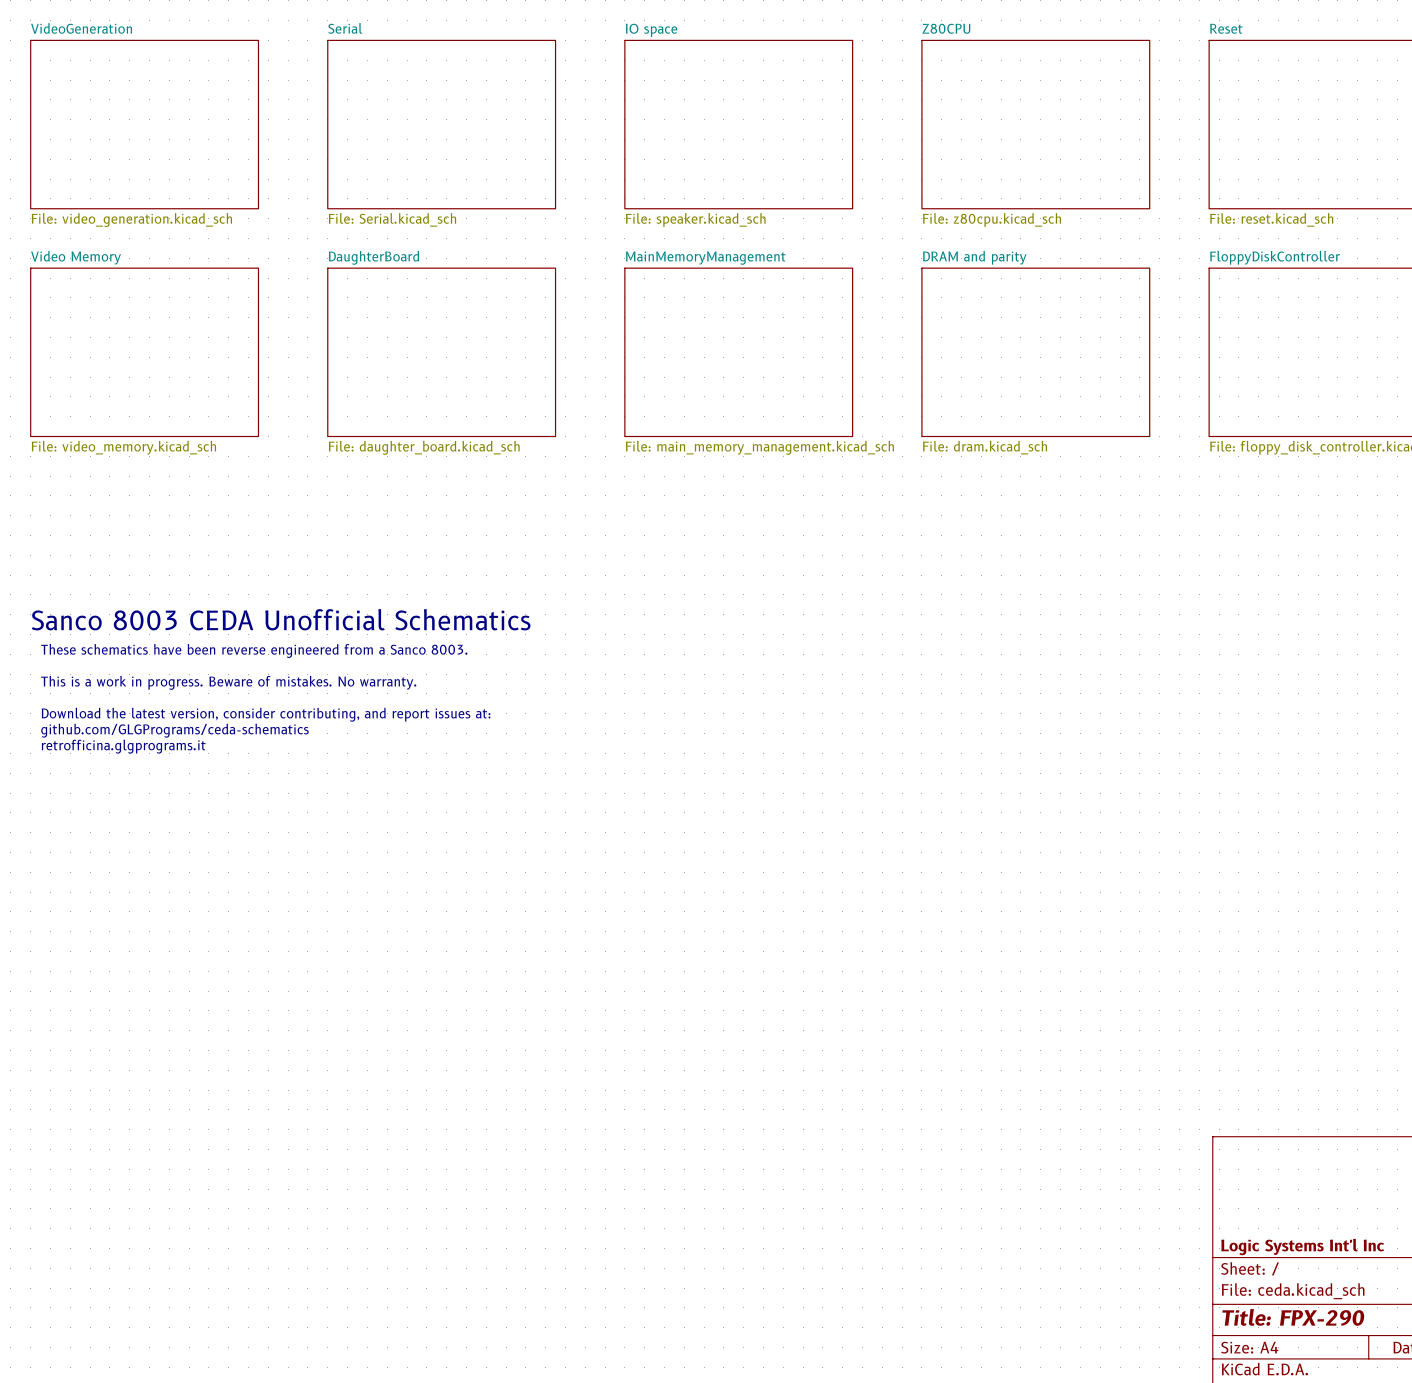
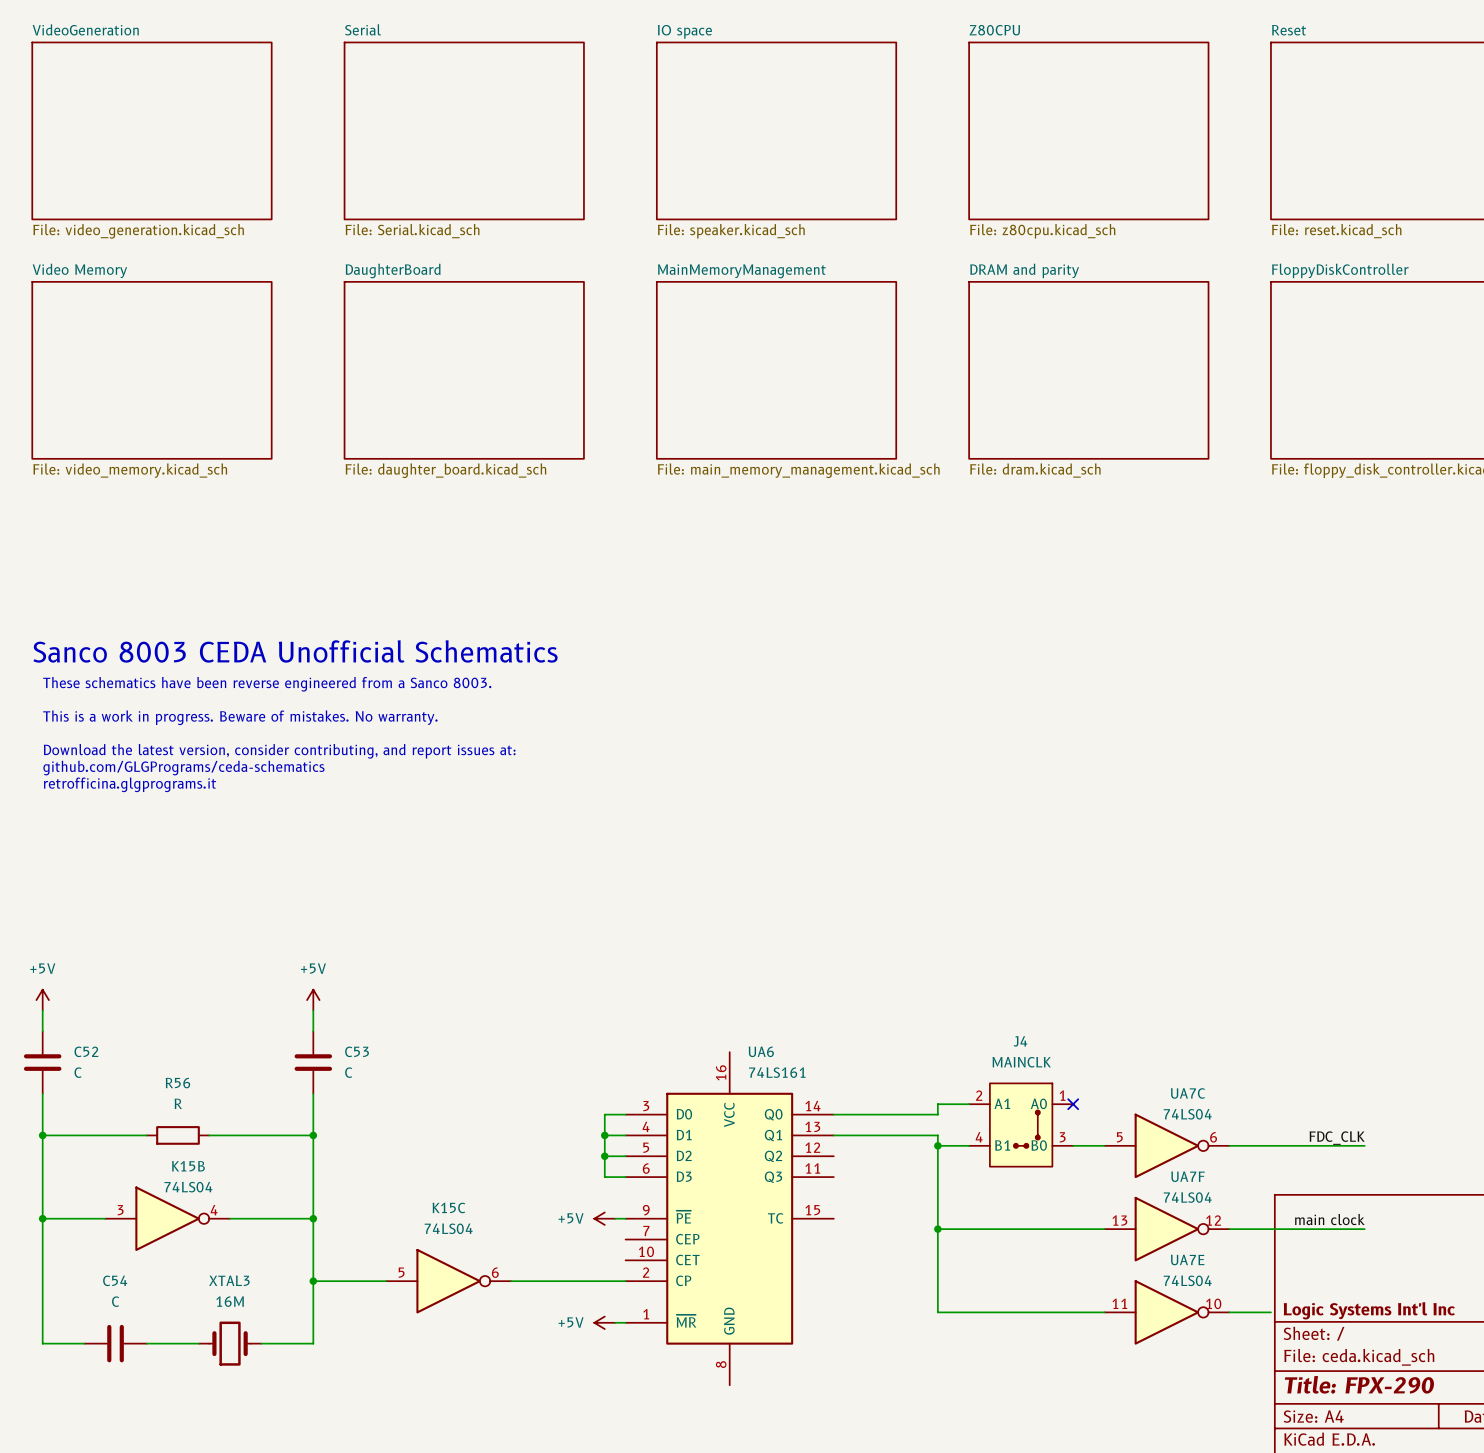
power symbol: none -> +5V (42, 1000)
power symbol: none -> +5V (313, 1000)
wire: none -> (42, 1010) (42, 1031)
wire: none -> (313, 1010) (313, 1031)
C52: none -> C (42, 1062)
C53: none -> C (313, 1062)
wire: none -> (42, 1093) (42, 1343) (84, 1343)
wire: none -> (313, 1093) (313, 1343) (261, 1343)
wire: none -> (969, 1104) (937, 1104) (937, 1114) (833, 1114)
no-connect mark: none -> (1073, 1104)
wire: none -> (625, 1114) (604, 1114) (604, 1177) (625, 1177)
J4: none -> MAINCLK (1021, 1125)
wire: none -> (42, 1135) (146, 1135)
junction: none -> (42, 1135)
R56: none -> R (178, 1135)
wire: none -> (209, 1135) (313, 1135)
junction: none -> (313, 1135)
wire: none -> (604, 1135) (625, 1135)
junction: none -> (604, 1135)
wire: none -> (833, 1135) (937, 1135) (937, 1312) (1104, 1312)
label: none -> FDC_CLK (1337, 1138)
wire: none -> (937, 1145) (969, 1145)
junction: none -> (937, 1145)
wire: none -> (1073, 1145) (1104, 1145)
UA7C: none -> 74LS04 (1166, 1145)
wire: none -> (1229, 1145) (1364, 1145)
wire: none -> (604, 1156) (625, 1156)
junction: none -> (604, 1156)
wire: none -> (42, 1218) (105, 1218)
junction: none -> (42, 1218)
K15B: none -> 74LS04 (167, 1218)
wire: none -> (230, 1218) (313, 1218)
junction: none -> (313, 1218)
power symbol: none -> +5V (604, 1218)
wire: none -> (615, 1218) (625, 1218)
UA6: none -> 74LS161 (729, 1218)
label: none -> main clock (1329, 1219)
wire: none -> (937, 1229) (1104, 1229)
junction: none -> (937, 1229)
UA7F: none -> 74LS04 (1166, 1229)
wire: none -> (1229, 1229) (1364, 1229)
wire: none -> (313, 1281) (386, 1281)
junction: none -> (313, 1281)
K15C: none -> 74LS04 (448, 1281)
wire: none -> (511, 1281) (625, 1281)
UA7E: none -> 74LS04 (1166, 1312)
wire: none -> (1229, 1312) (1270, 1312)
power symbol: none -> +5V (604, 1322)
wire: none -> (615, 1322) (625, 1322)
C54: none -> C (115, 1343)
wire: none -> (146, 1343) (198, 1343)
XTAL3: none -> 16M (230, 1343)

